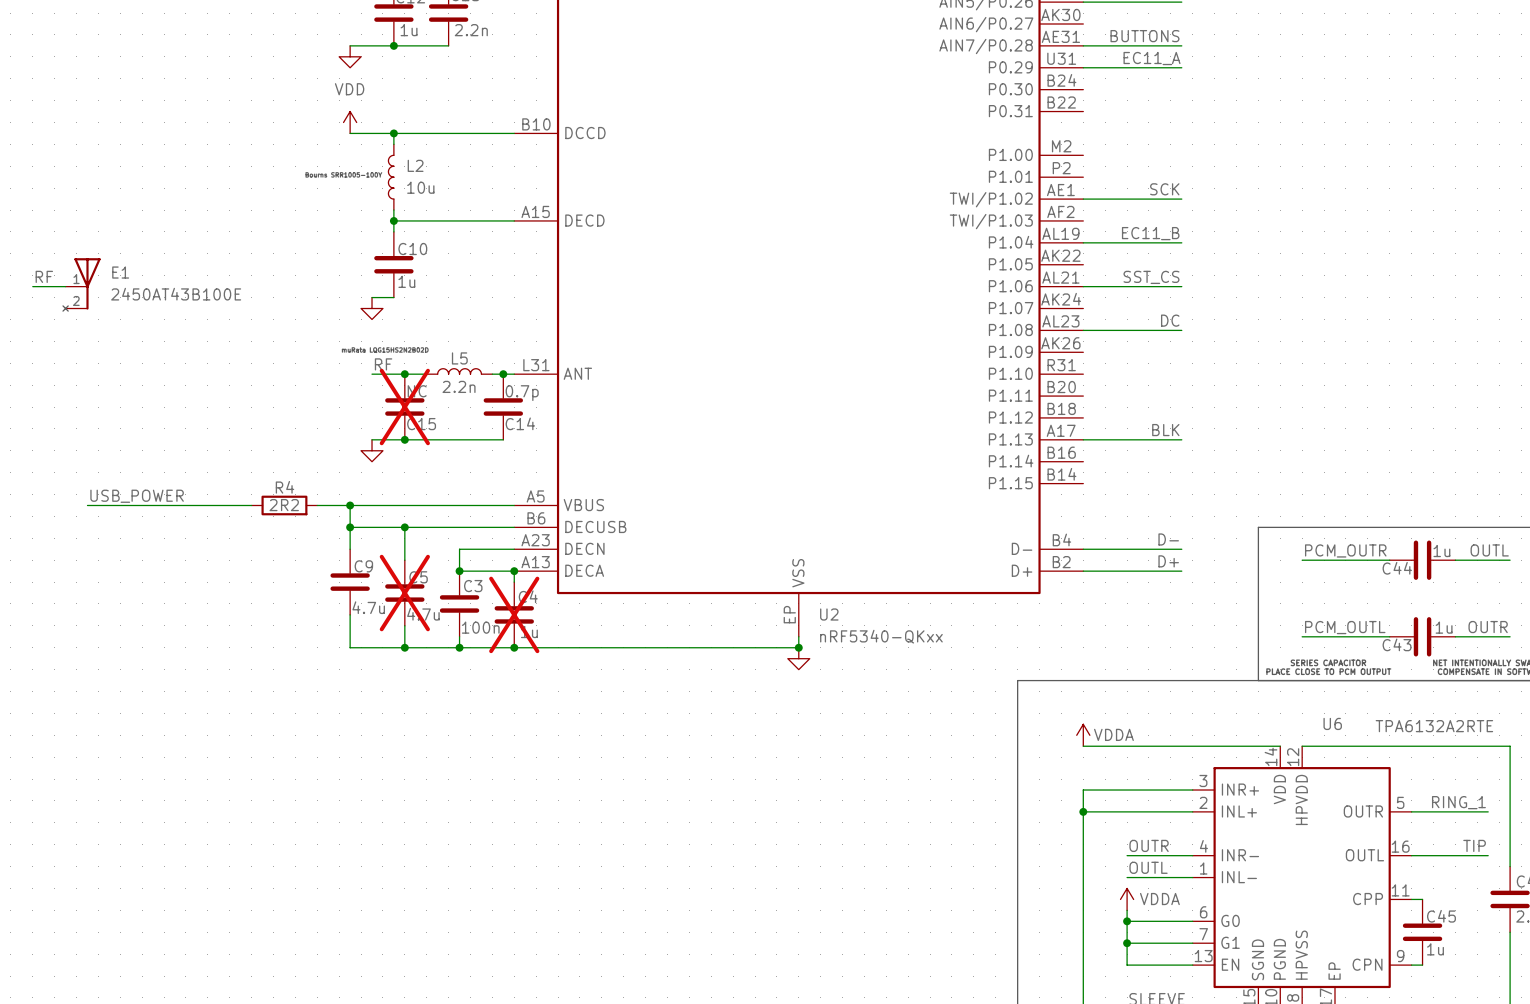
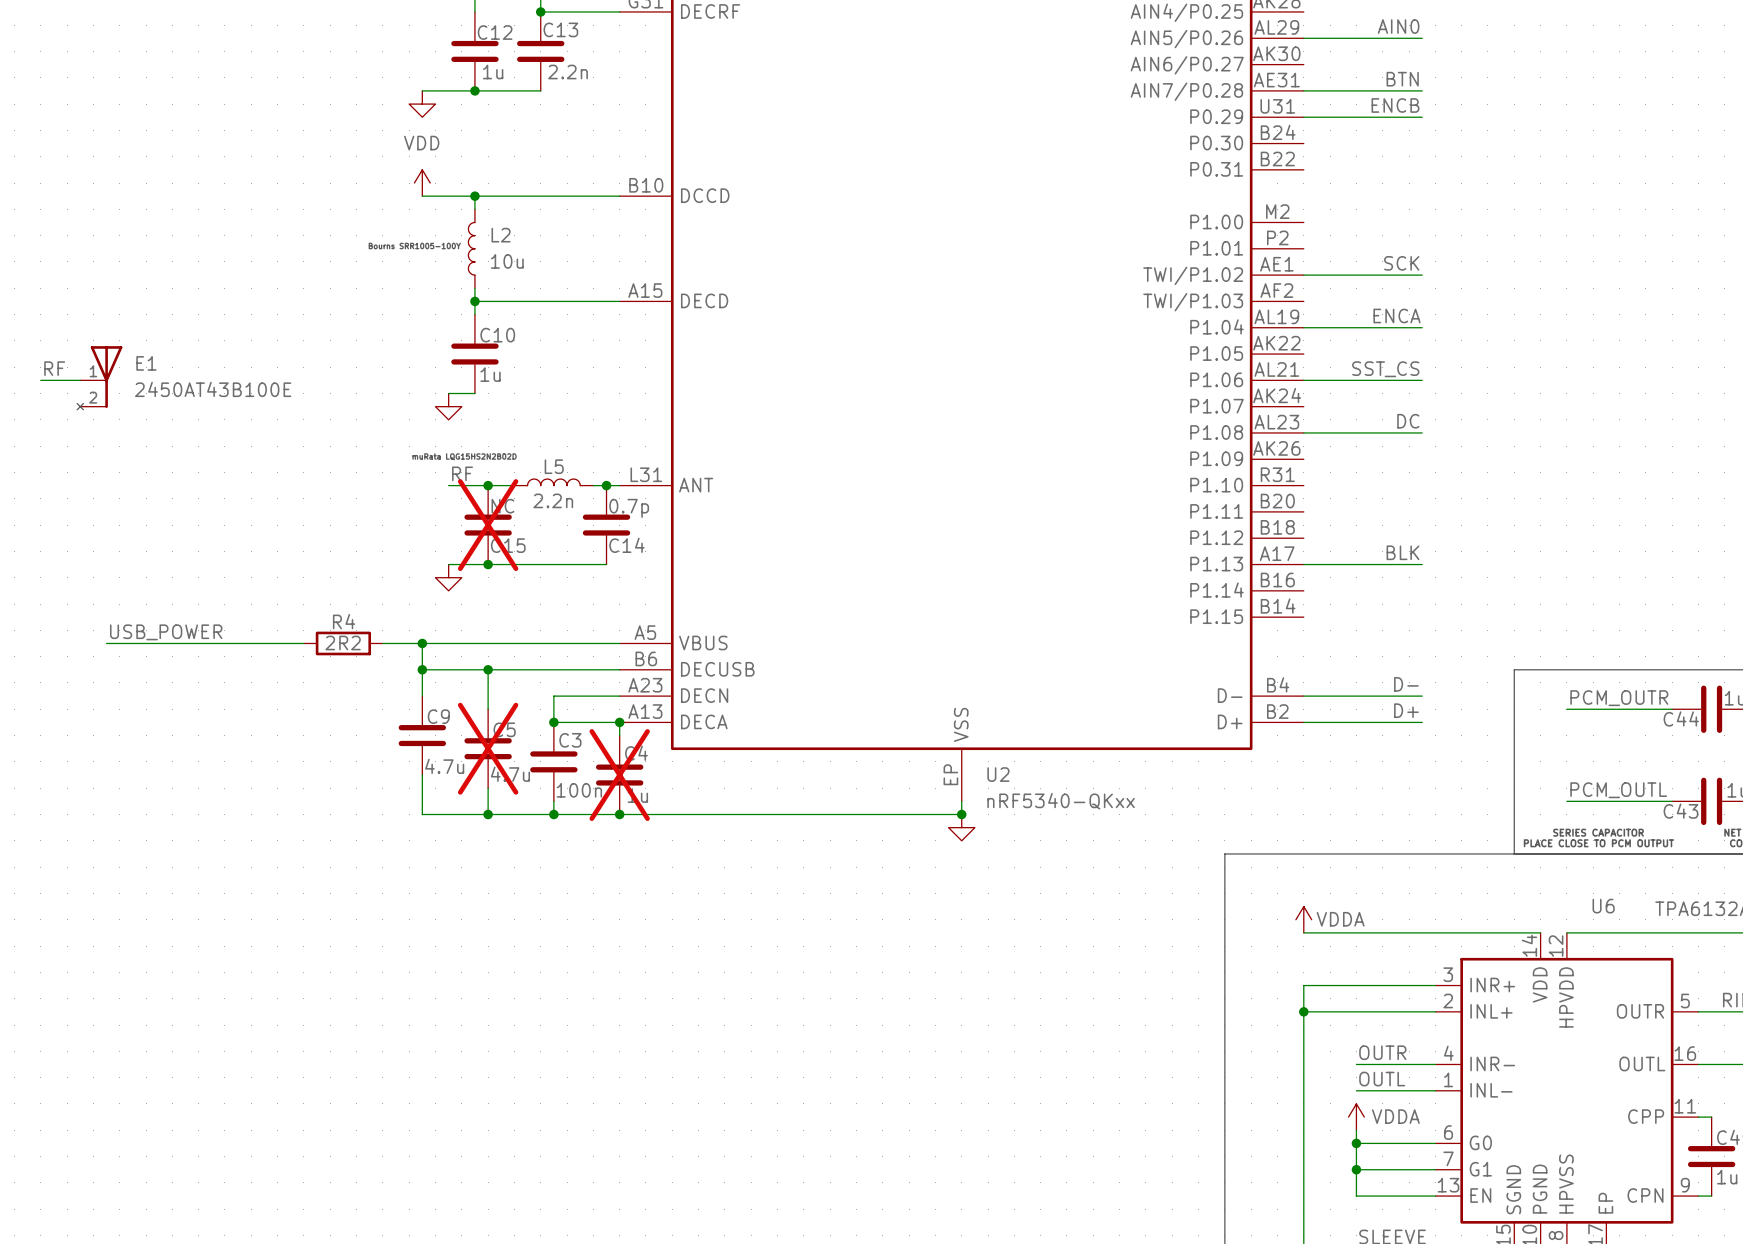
label: BUTTONS (1144, 36) -> BTN (1402, 79)
label: EC11_A (1152, 58) -> ENCB (1395, 105)
label: EC11_B (1150, 233) -> ENCA (1397, 315)

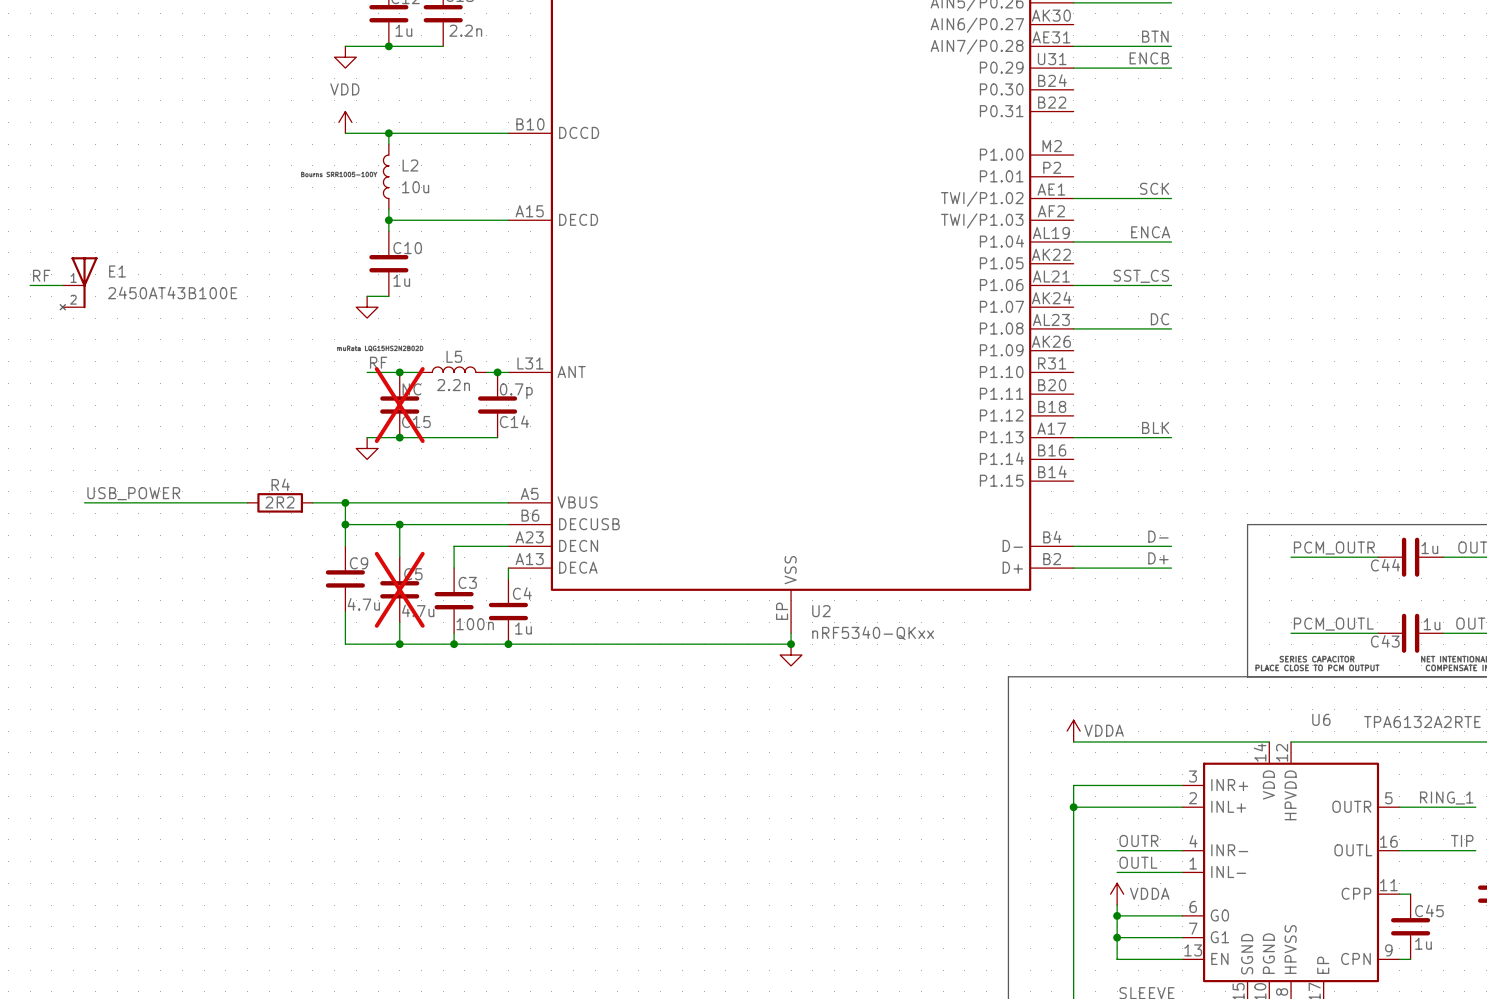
wire: (553, 722) (619, 722) -> none
junction: (553, 722) -> none
junction: (619, 722) -> none
C4 do-not-place cross: (619, 775) -> none

